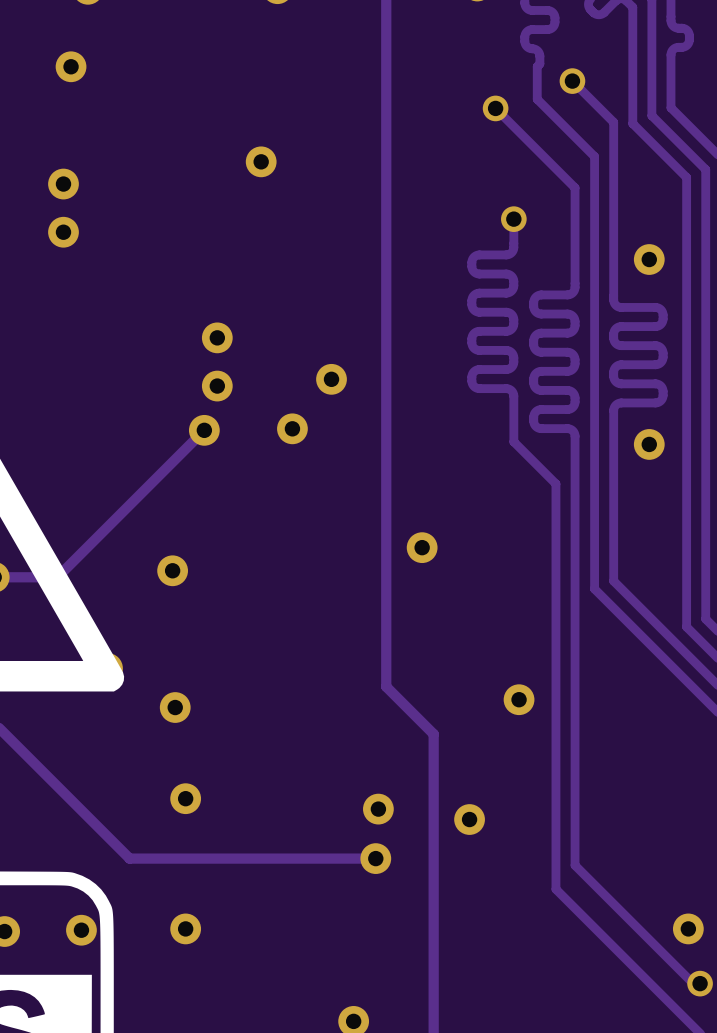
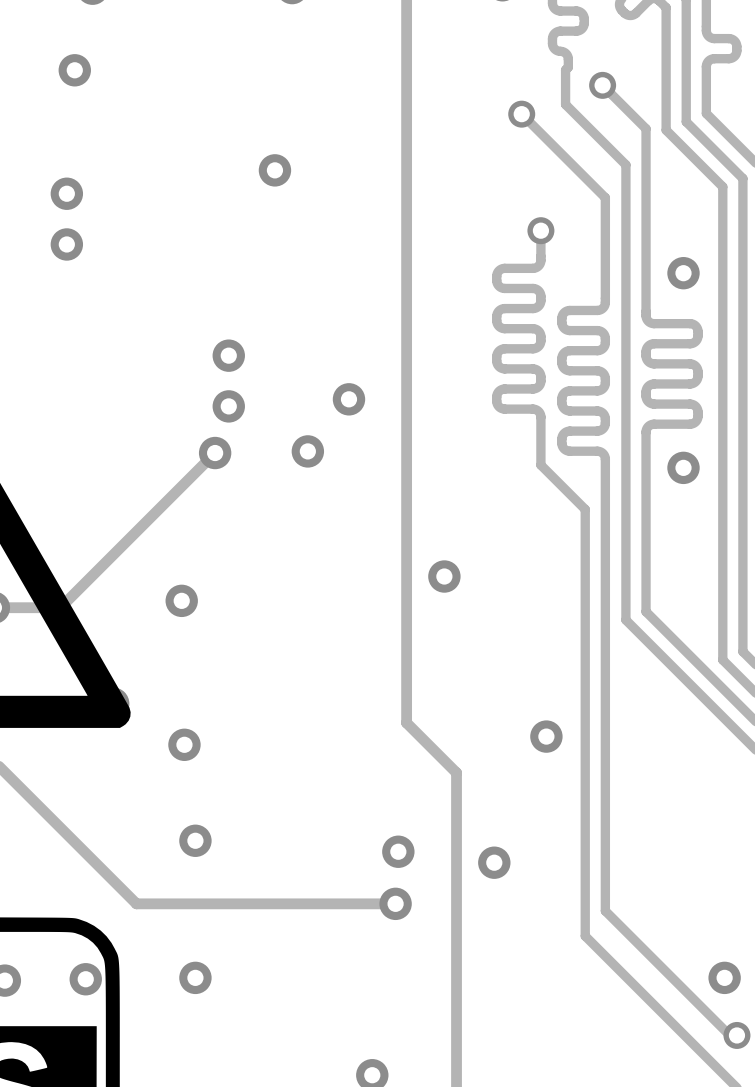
track: (670, 20) (674, 27) (686, 29) (689, 35) (686, 45) (676, 47) (672, 50) (670, 63) -> (706, 21) (706, 32) (709, 36) (731, 39) (736, 46) (736, 53) (733, 57) (711, 59) (706, 66)

